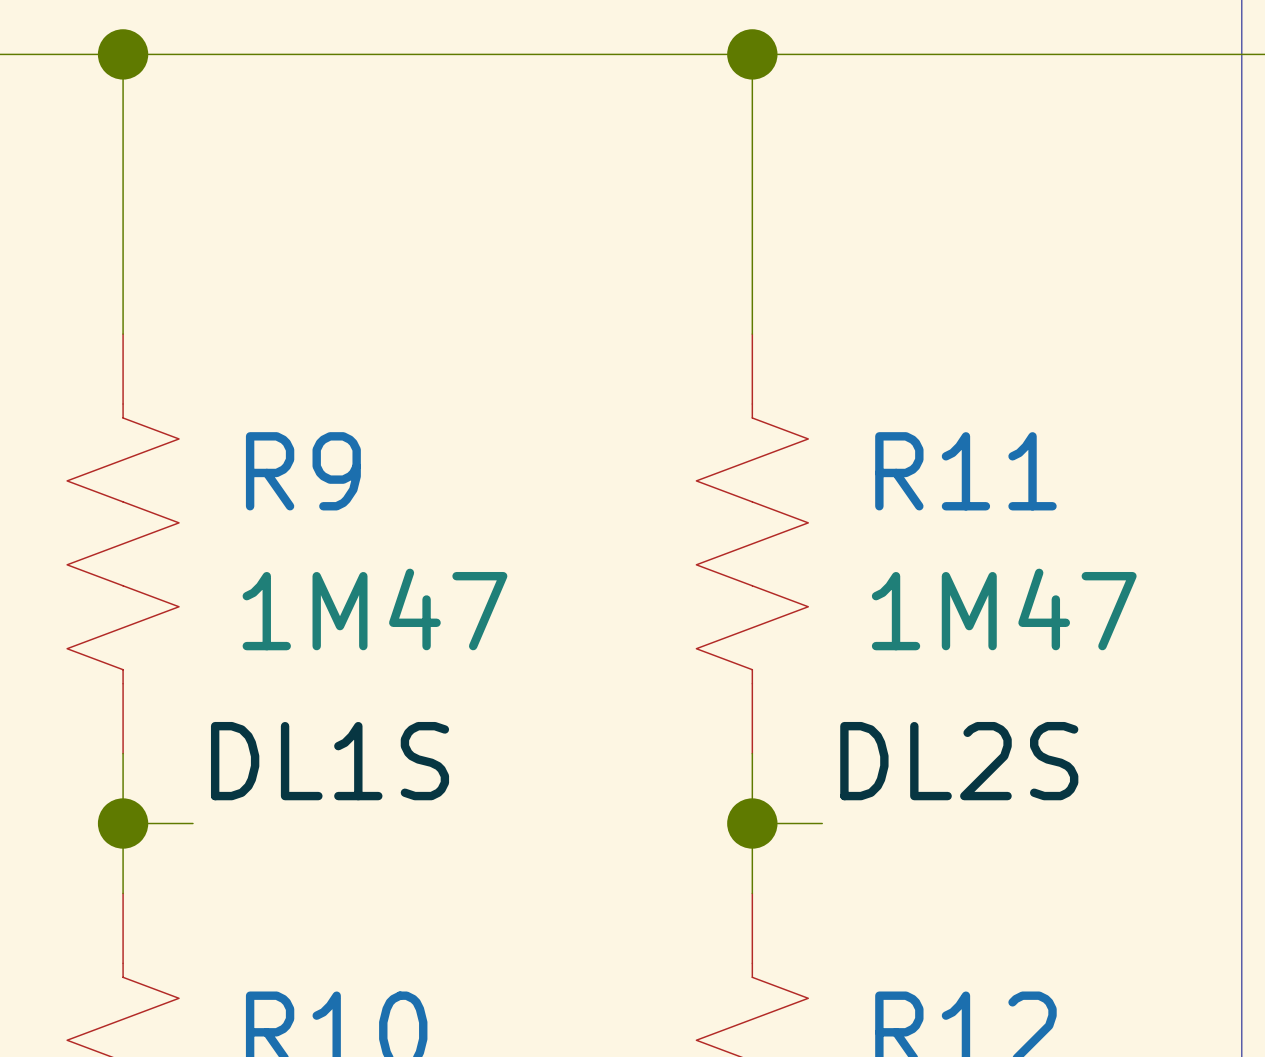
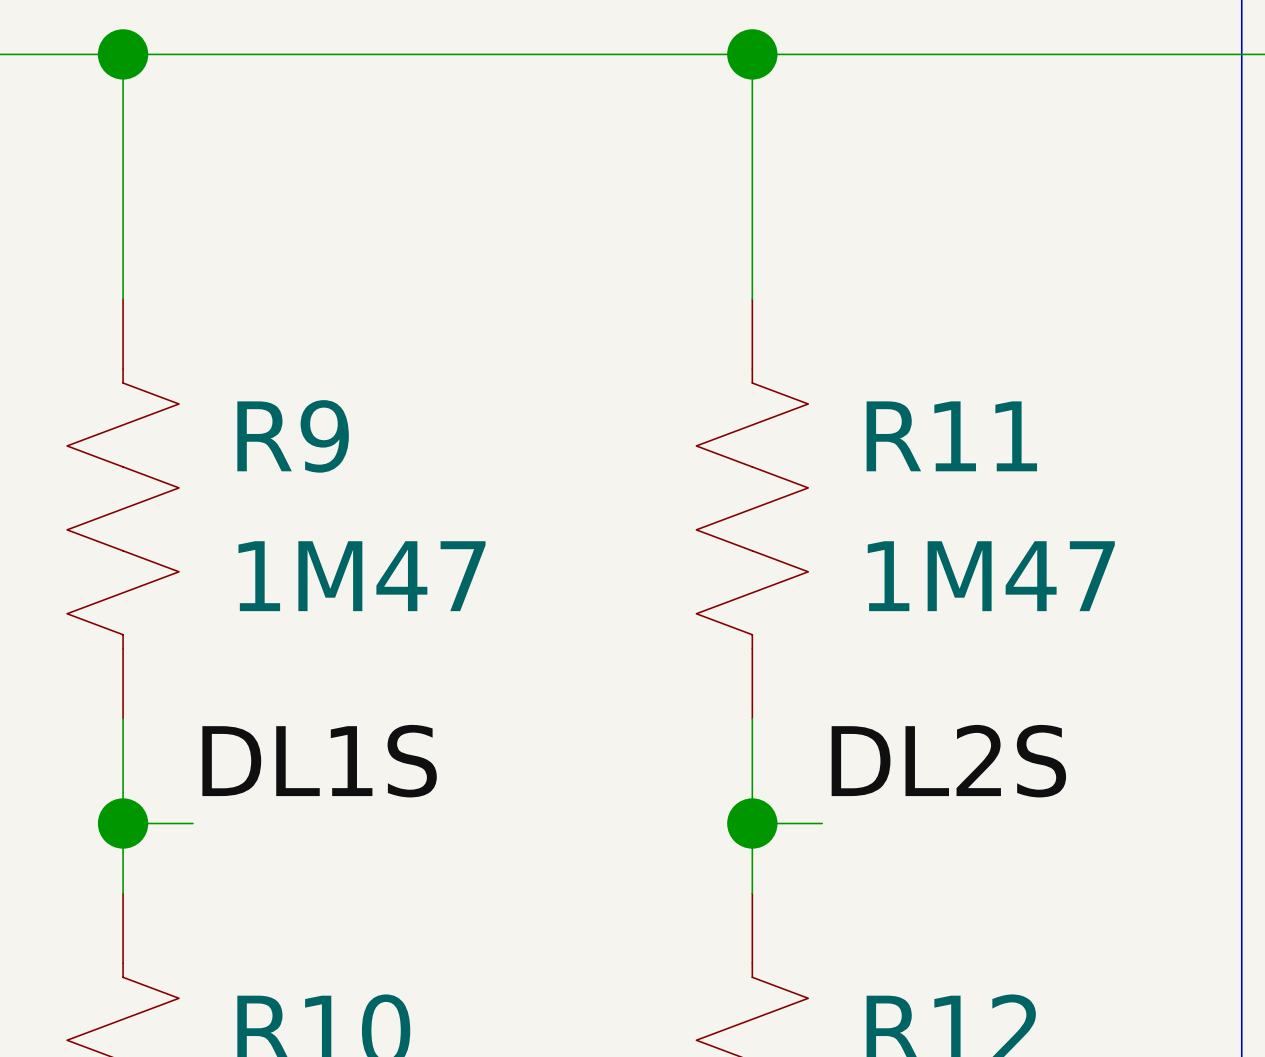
R9 position: (123, 543) -> (123, 508)
R11 position: (752, 543) -> (752, 508)

